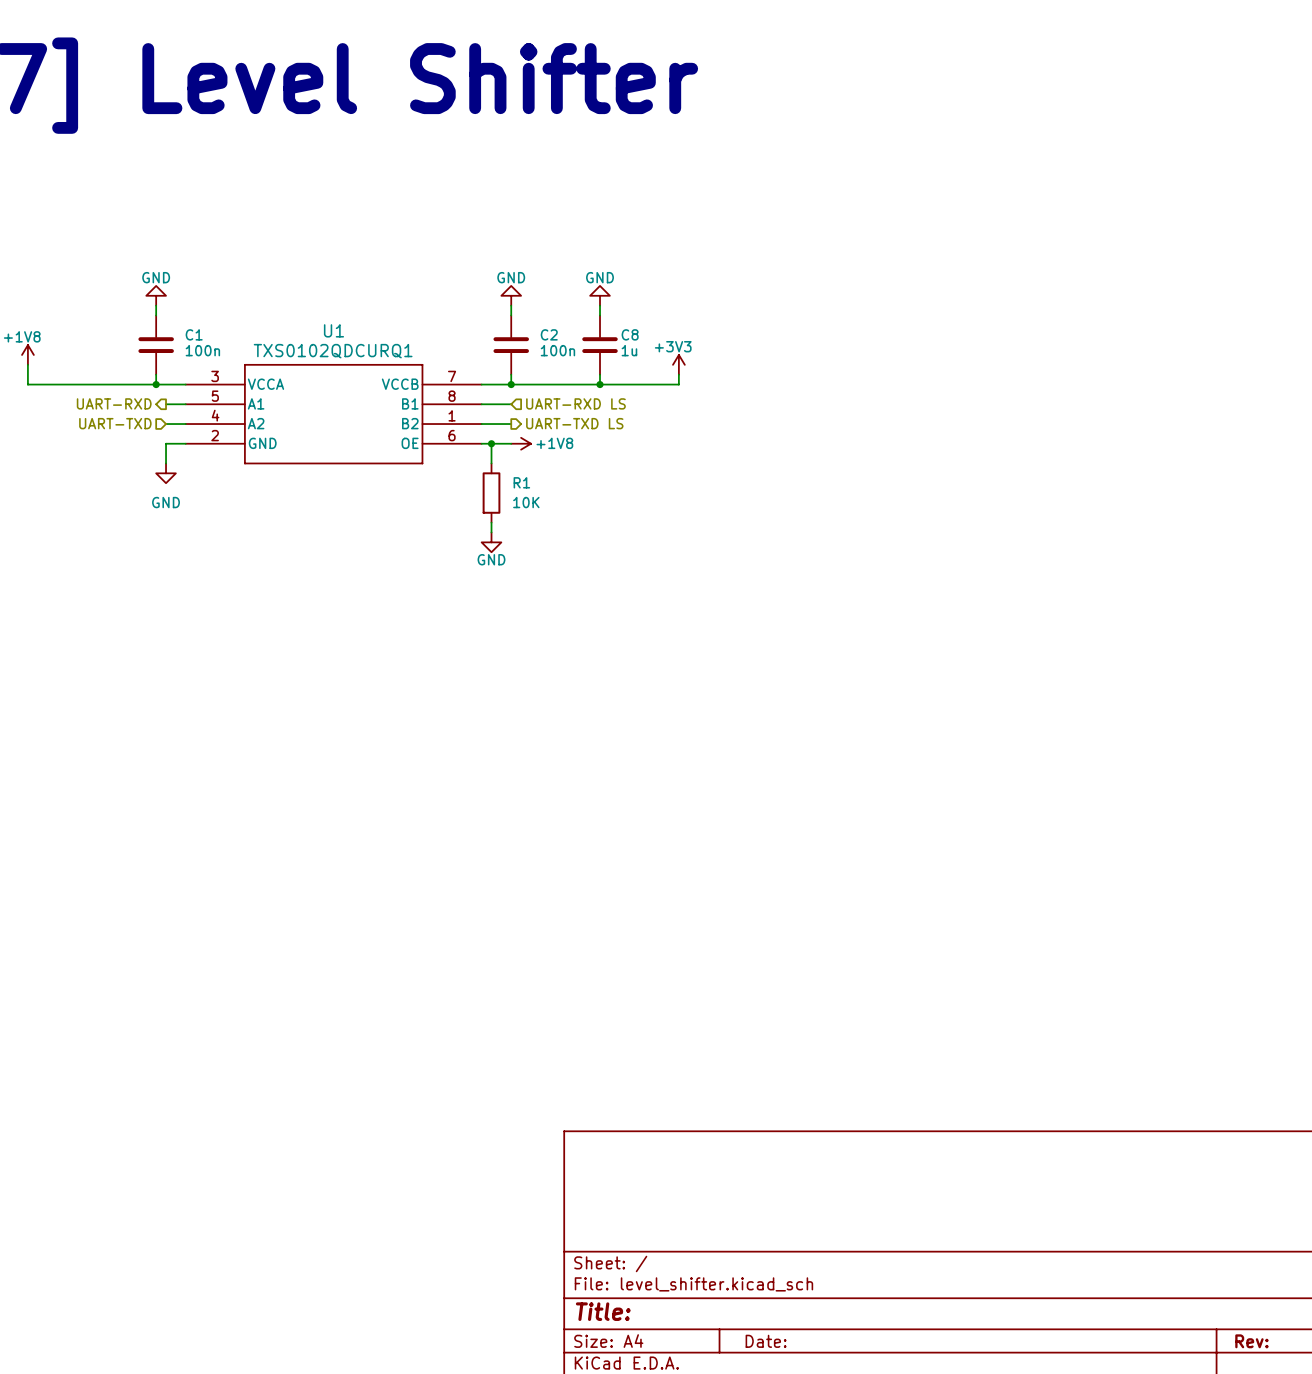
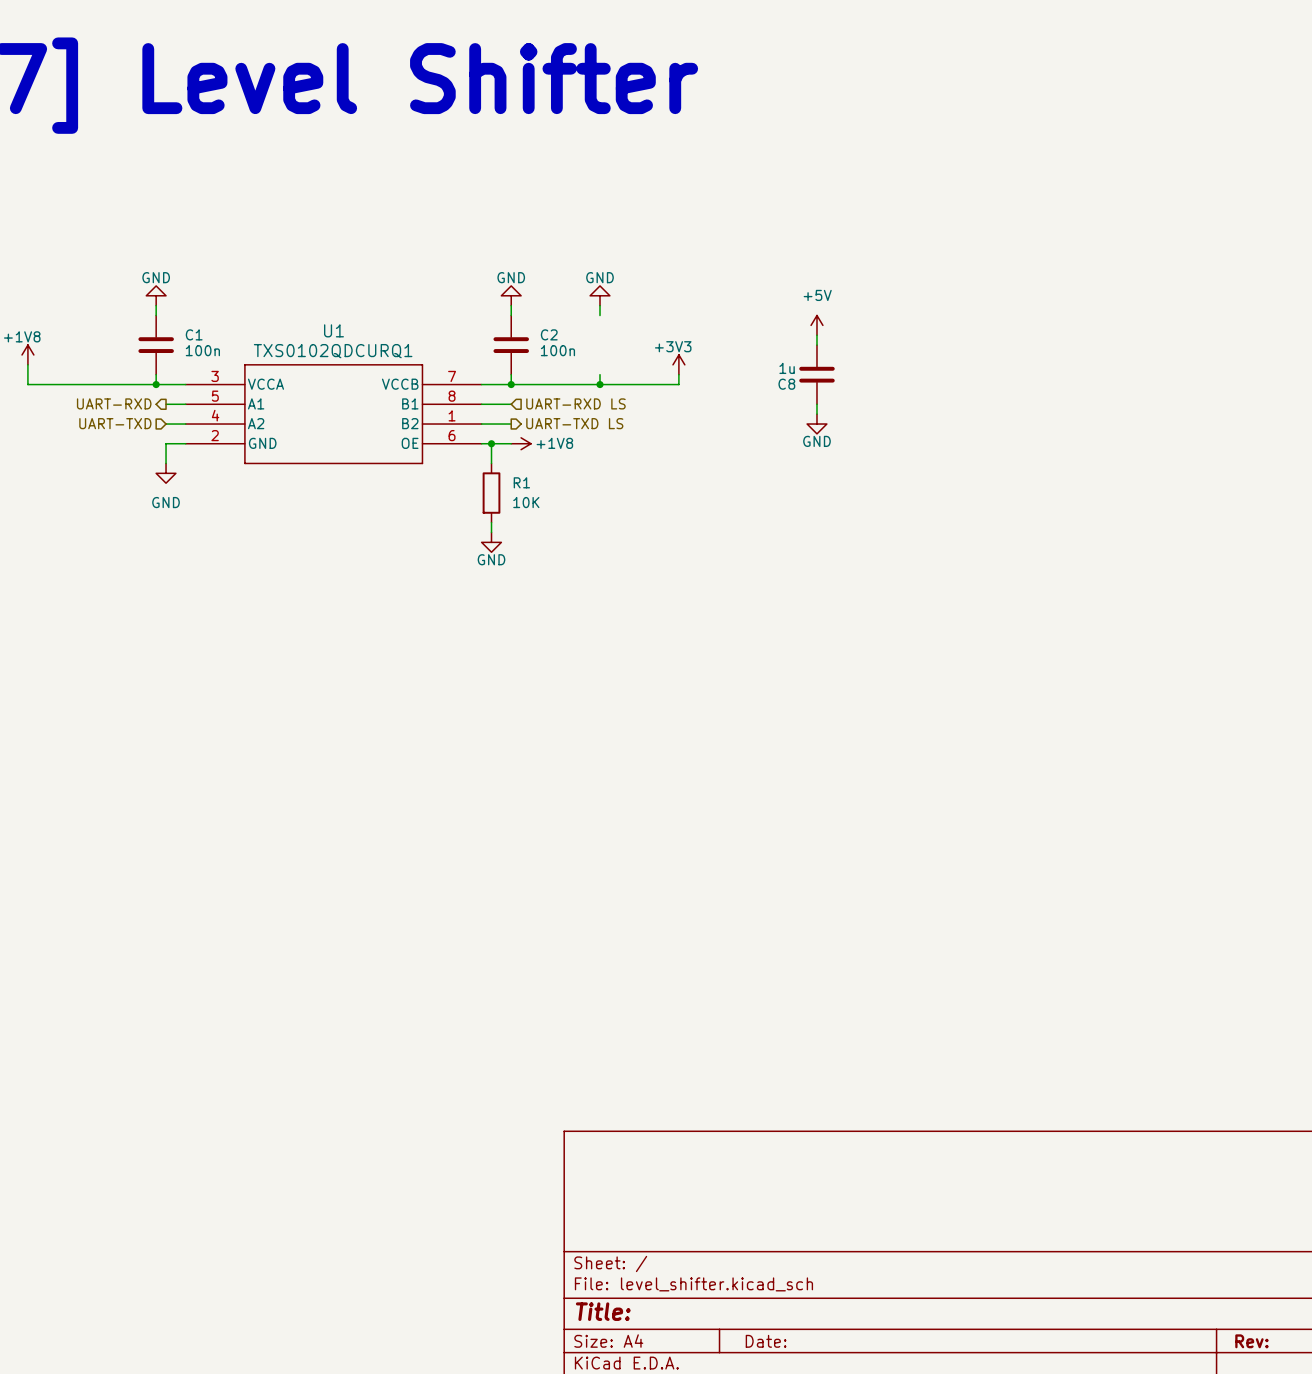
power symbol: none -> +5V (816, 325)
C8 name position: C8 (630, 334) -> C8 (786, 384)
wire: none -> (816, 335) (816, 345)
C8 position: (600, 345) -> (816, 374)
C8 value position: 1u (629, 350) -> 1u (787, 368)
wire: none -> (816, 404) (816, 414)
power symbol: none -> GND (816, 424)

